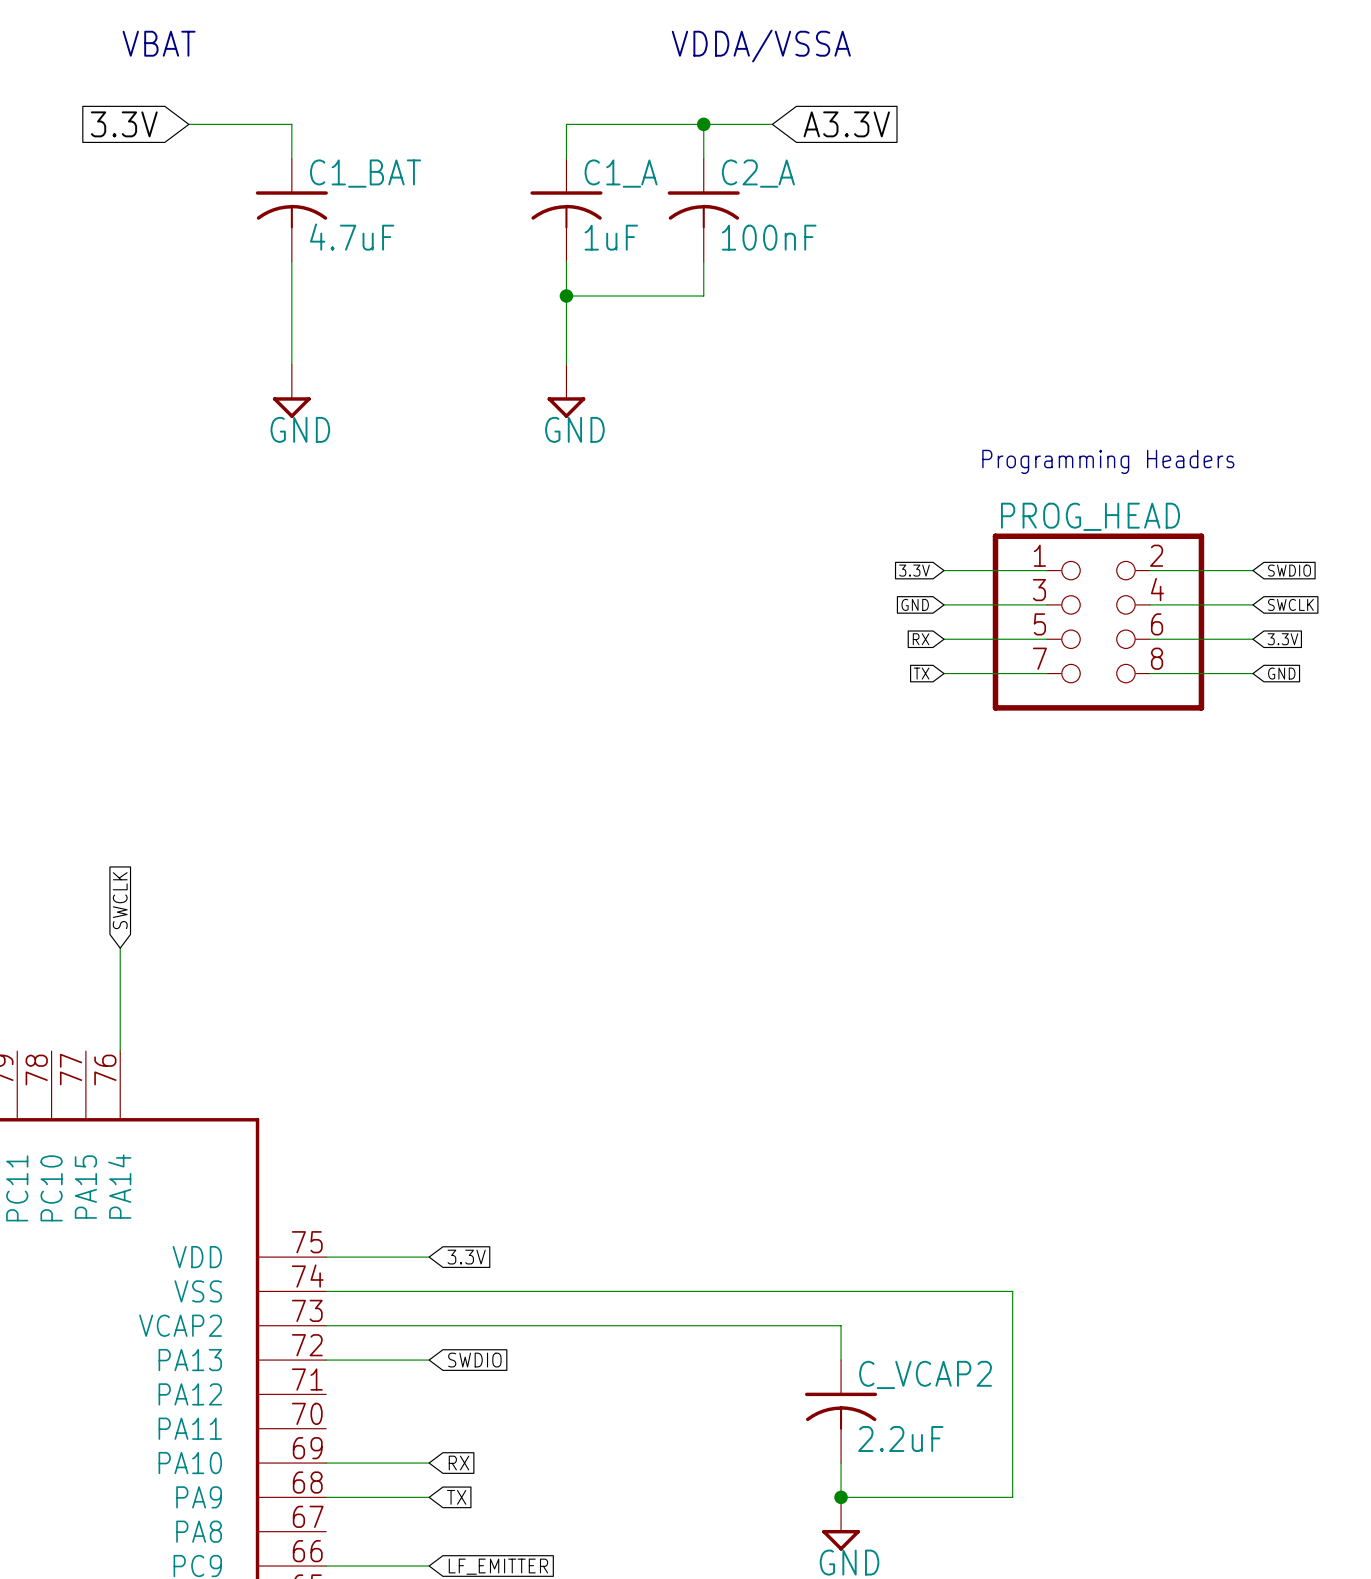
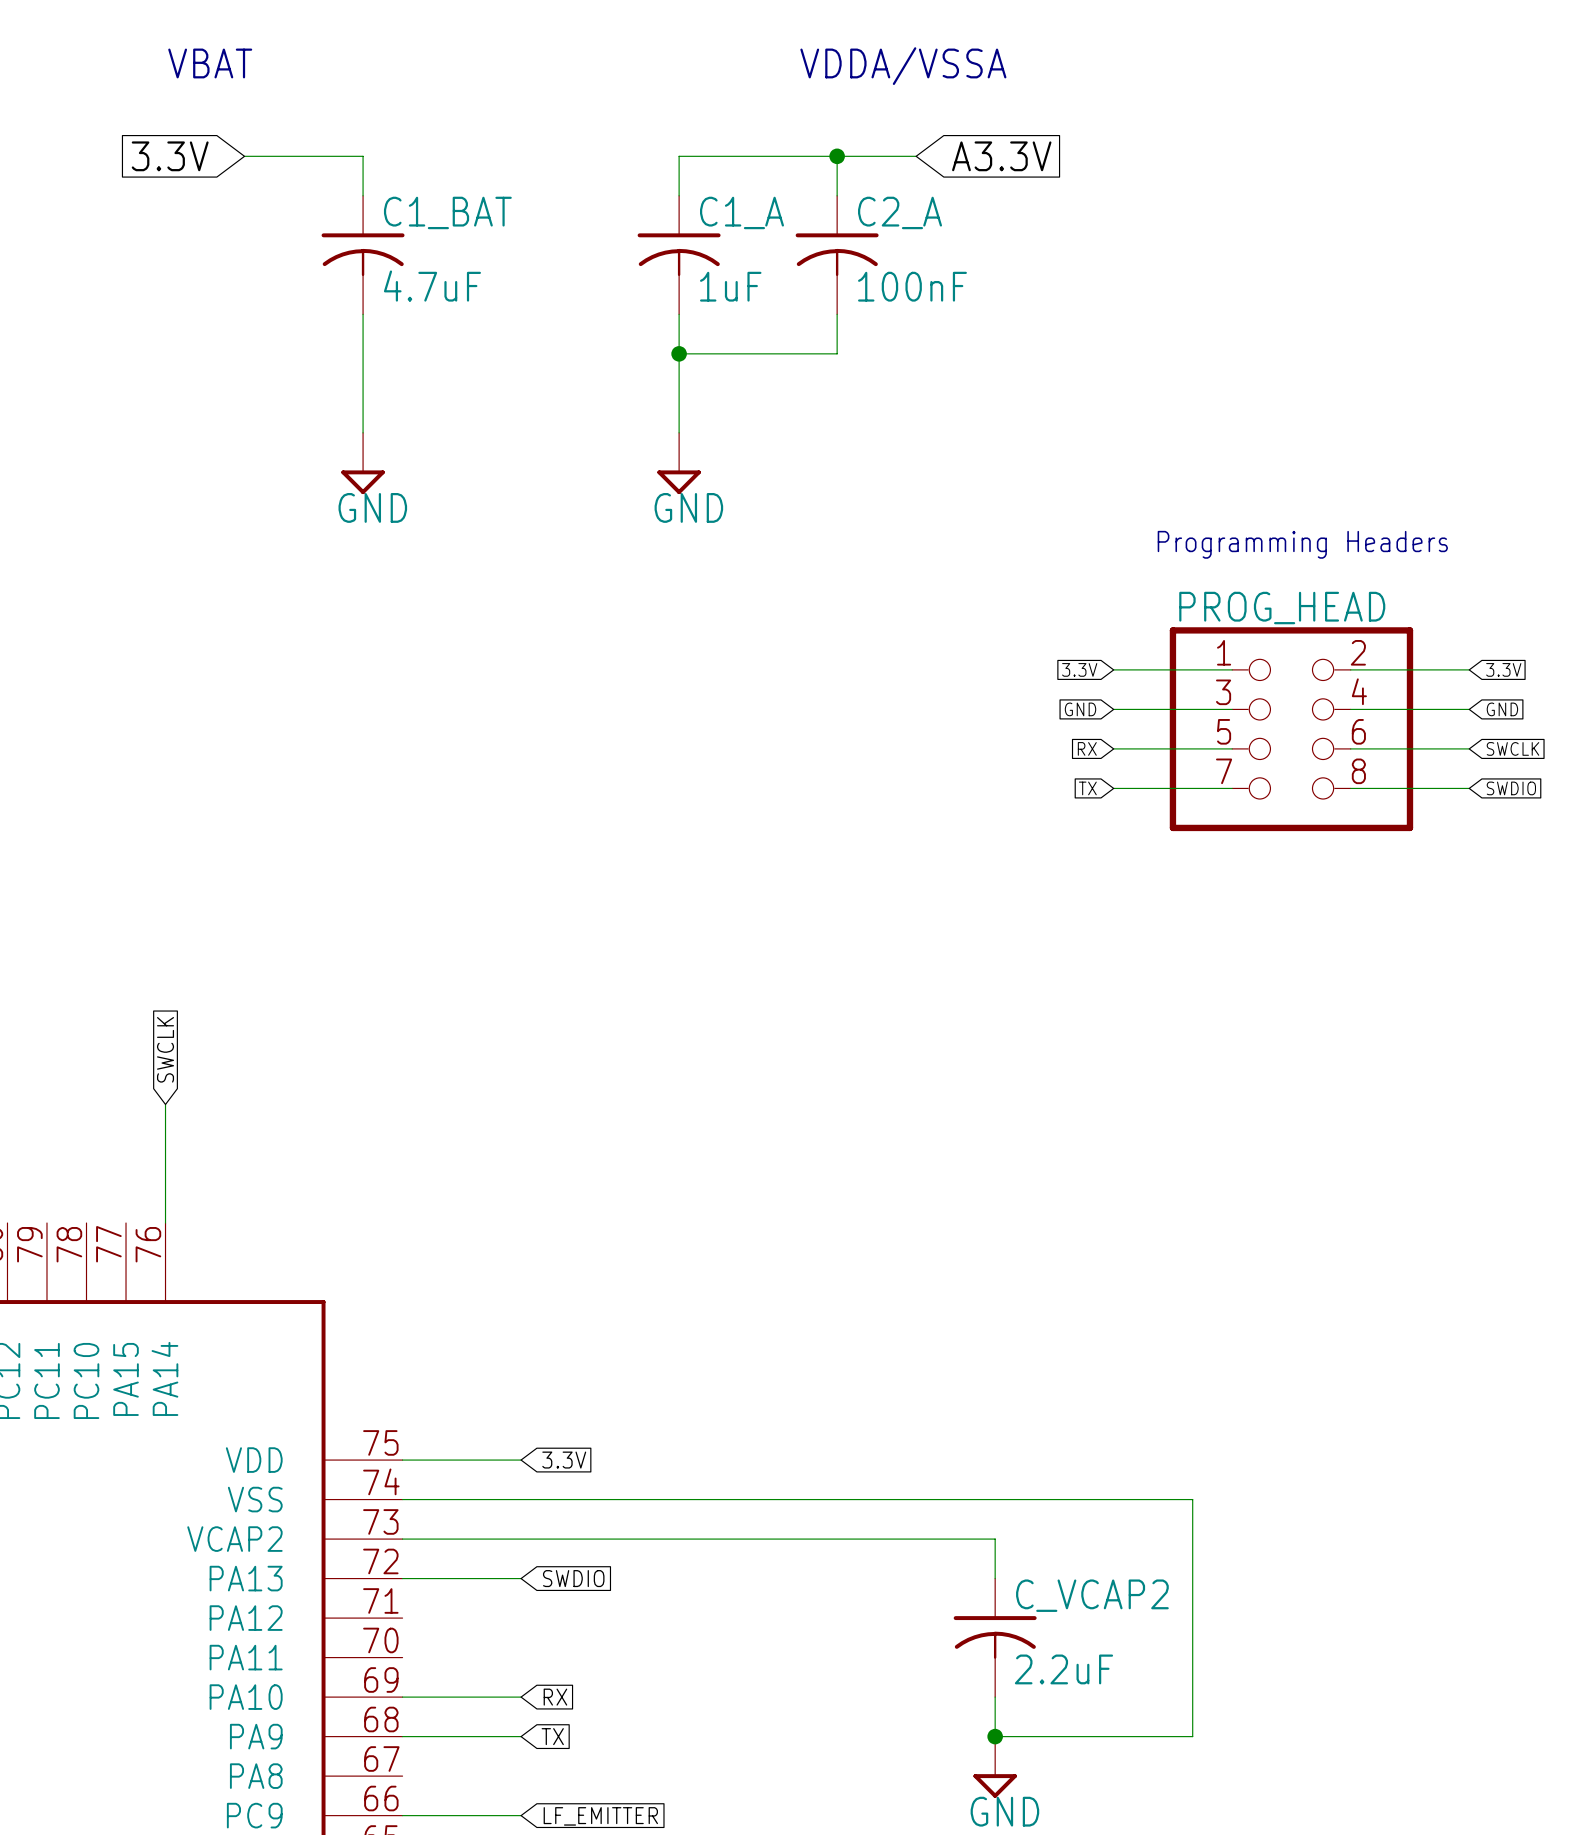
global label: SWDIO (1289, 570) -> 3.3V (1503, 669)
global label: SWCLK (1290, 604) -> GND (1502, 709)
global label: 3.3V (1282, 639) -> SWCLK (1512, 748)
global label: GND (1281, 673) -> SWDIO (1511, 788)

